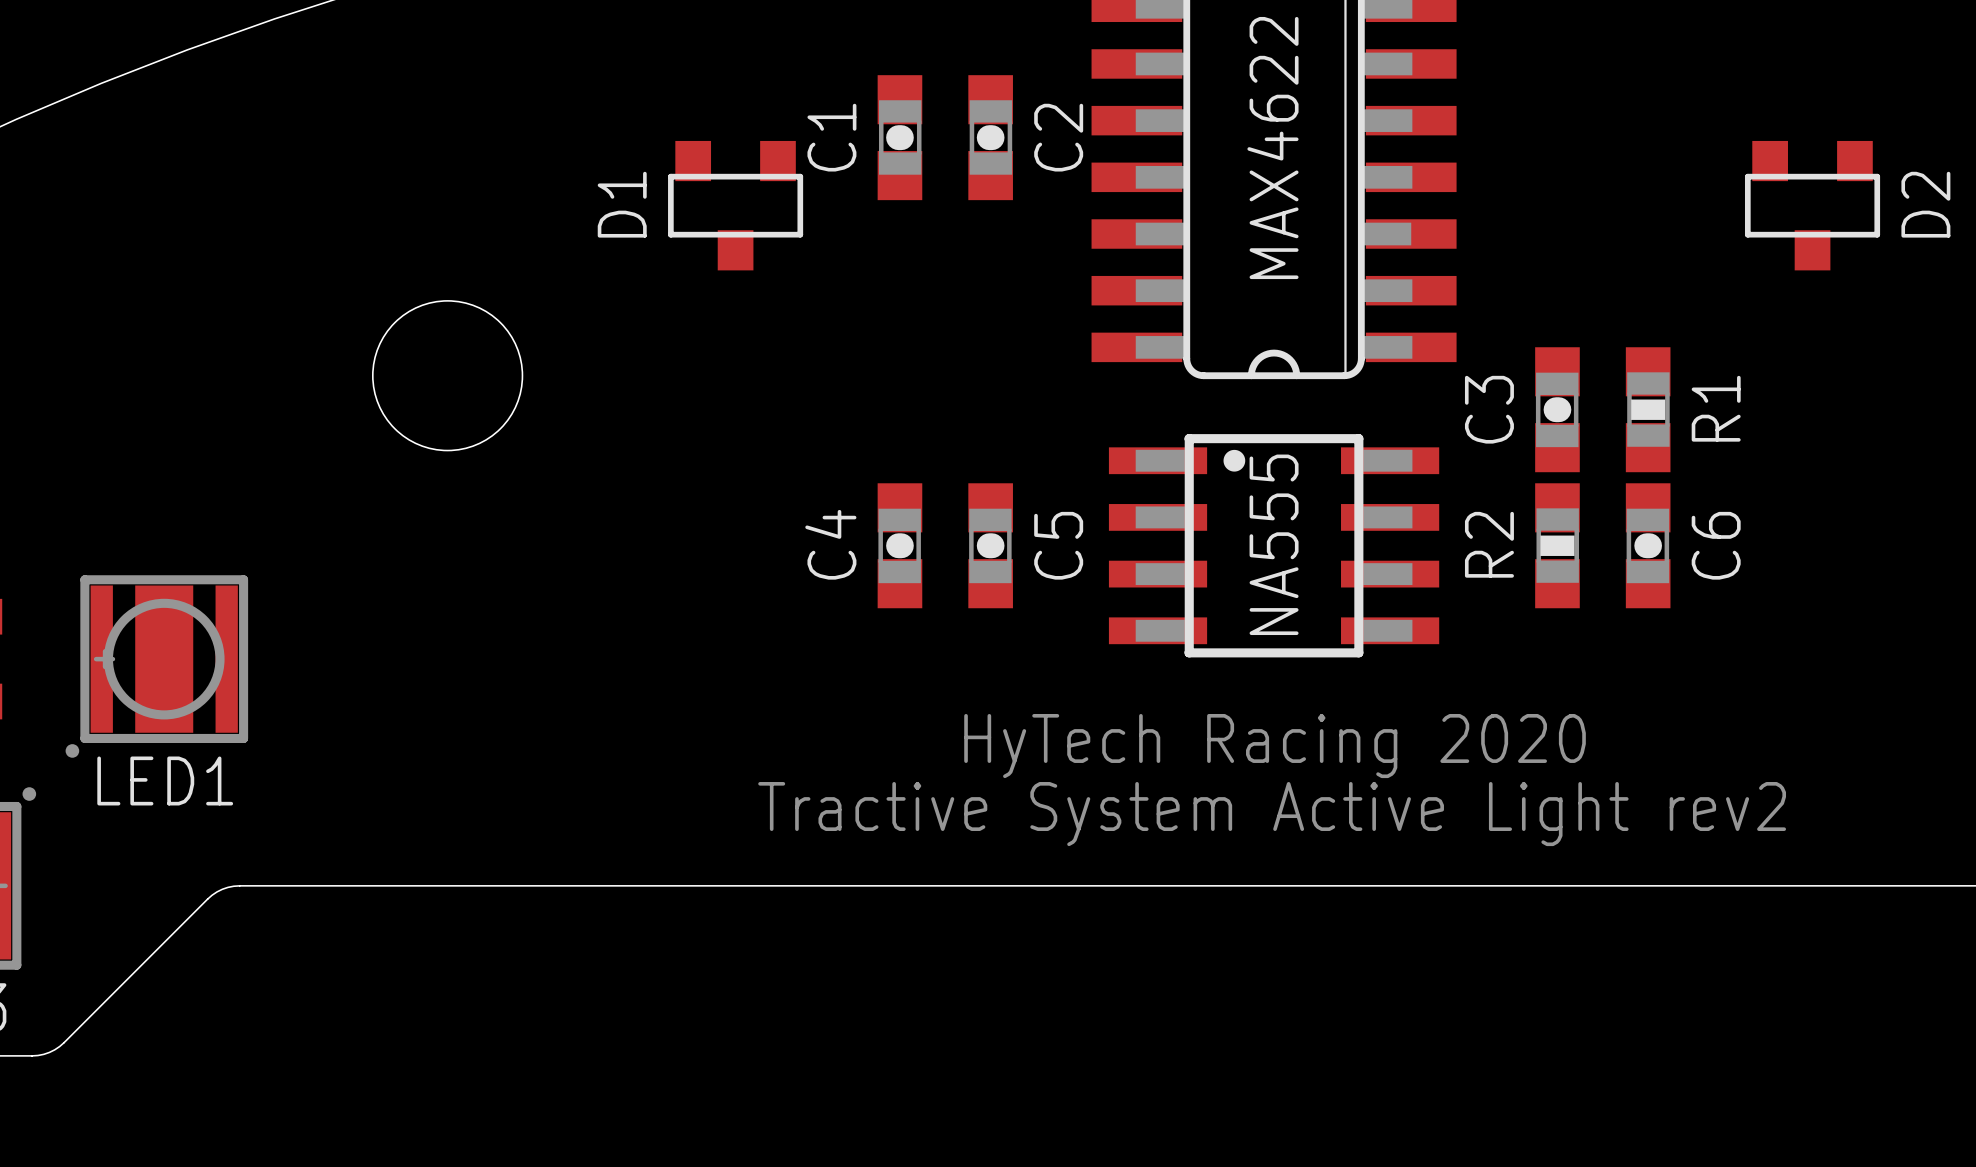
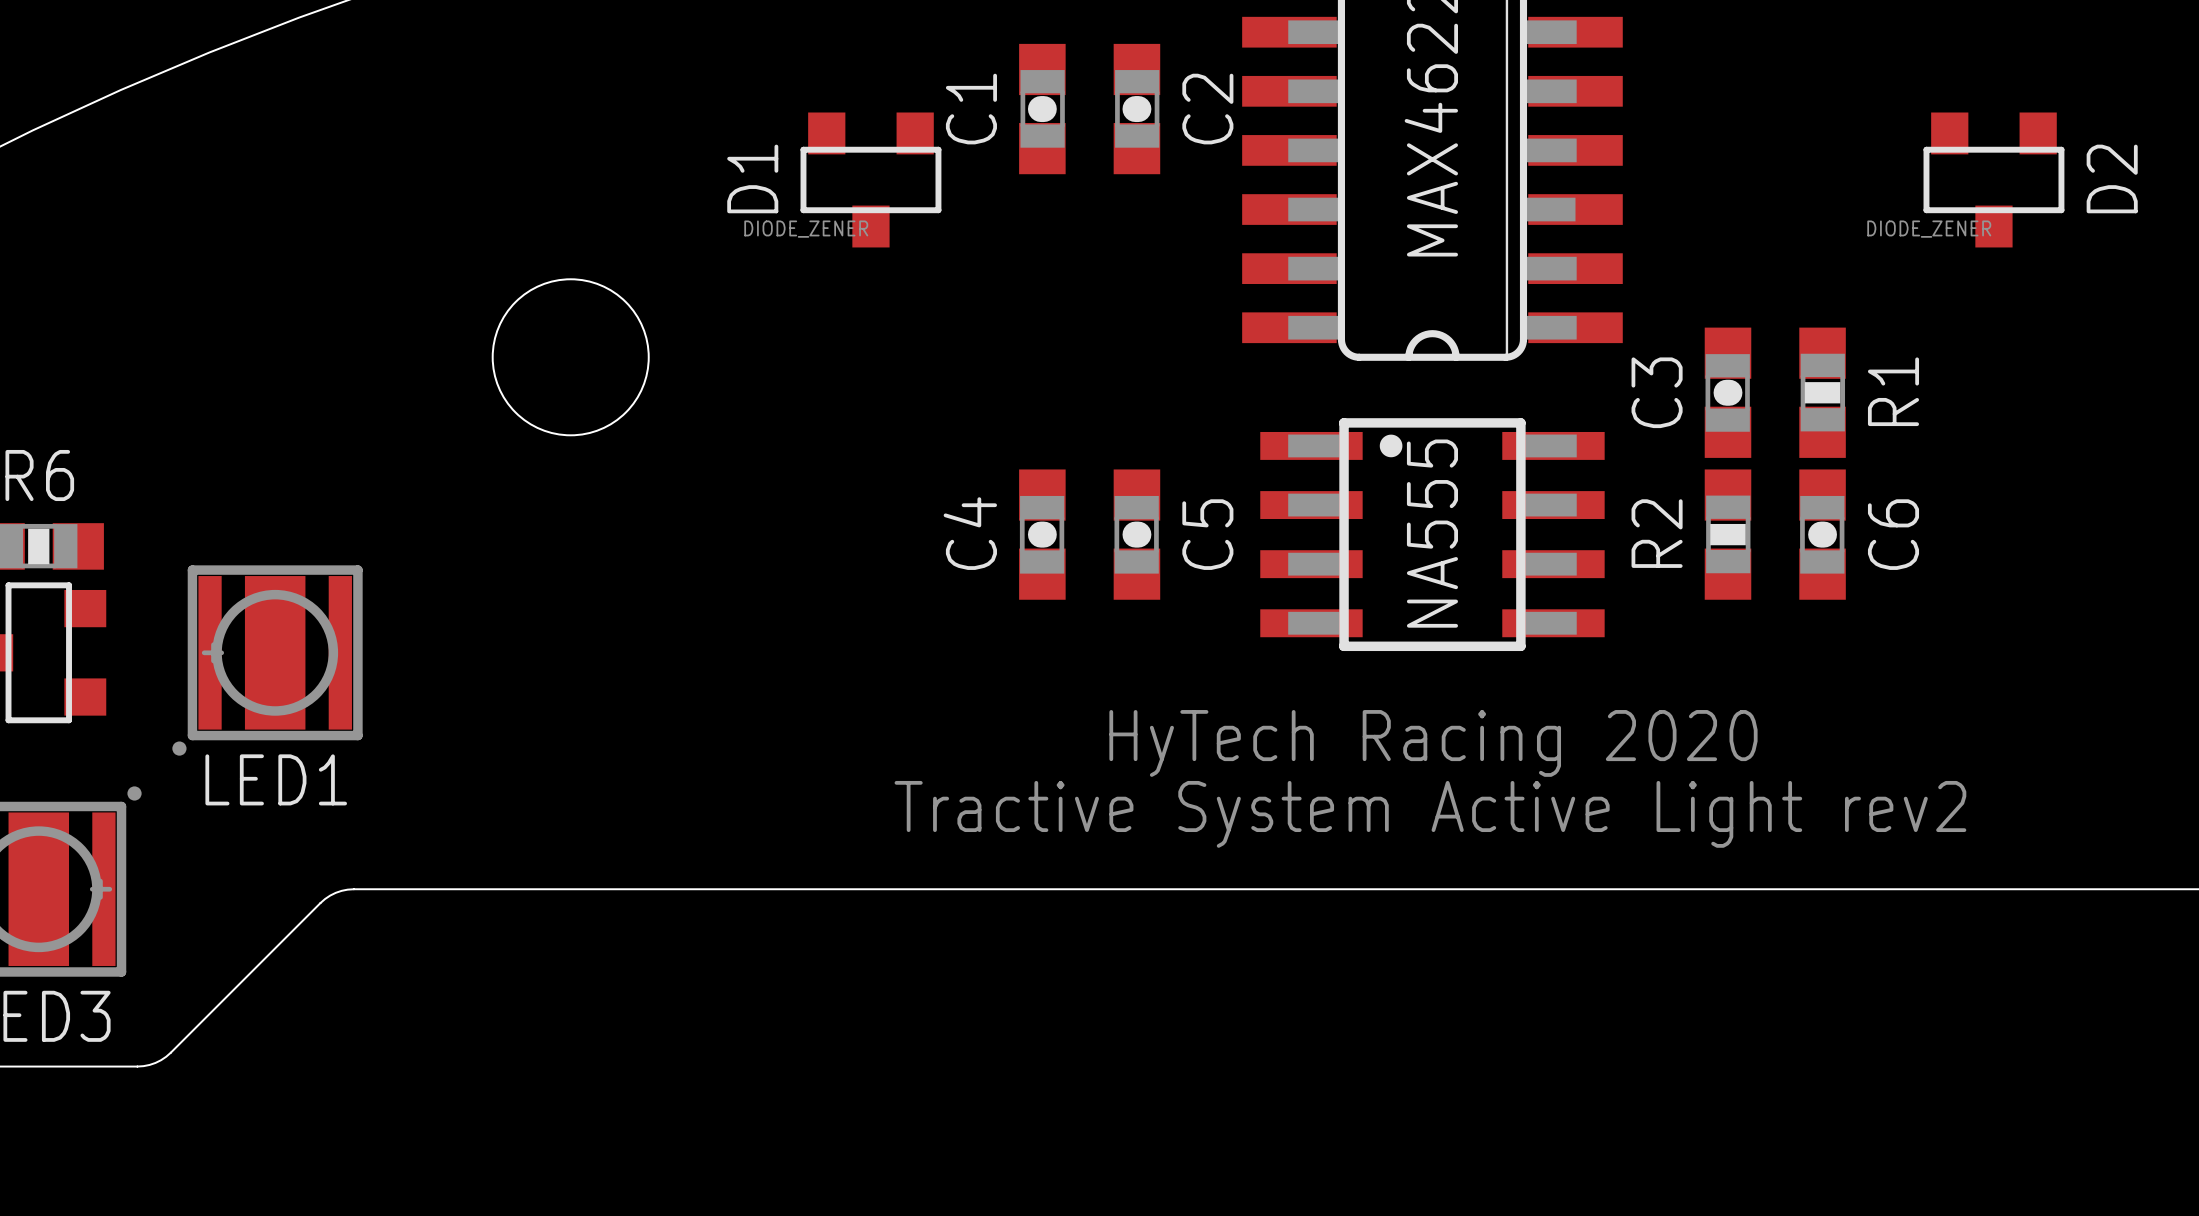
D1 value: none -> DIODE_ZENER (806, 229)
D2 value: none -> DIODE_ZENER (1929, 229)

